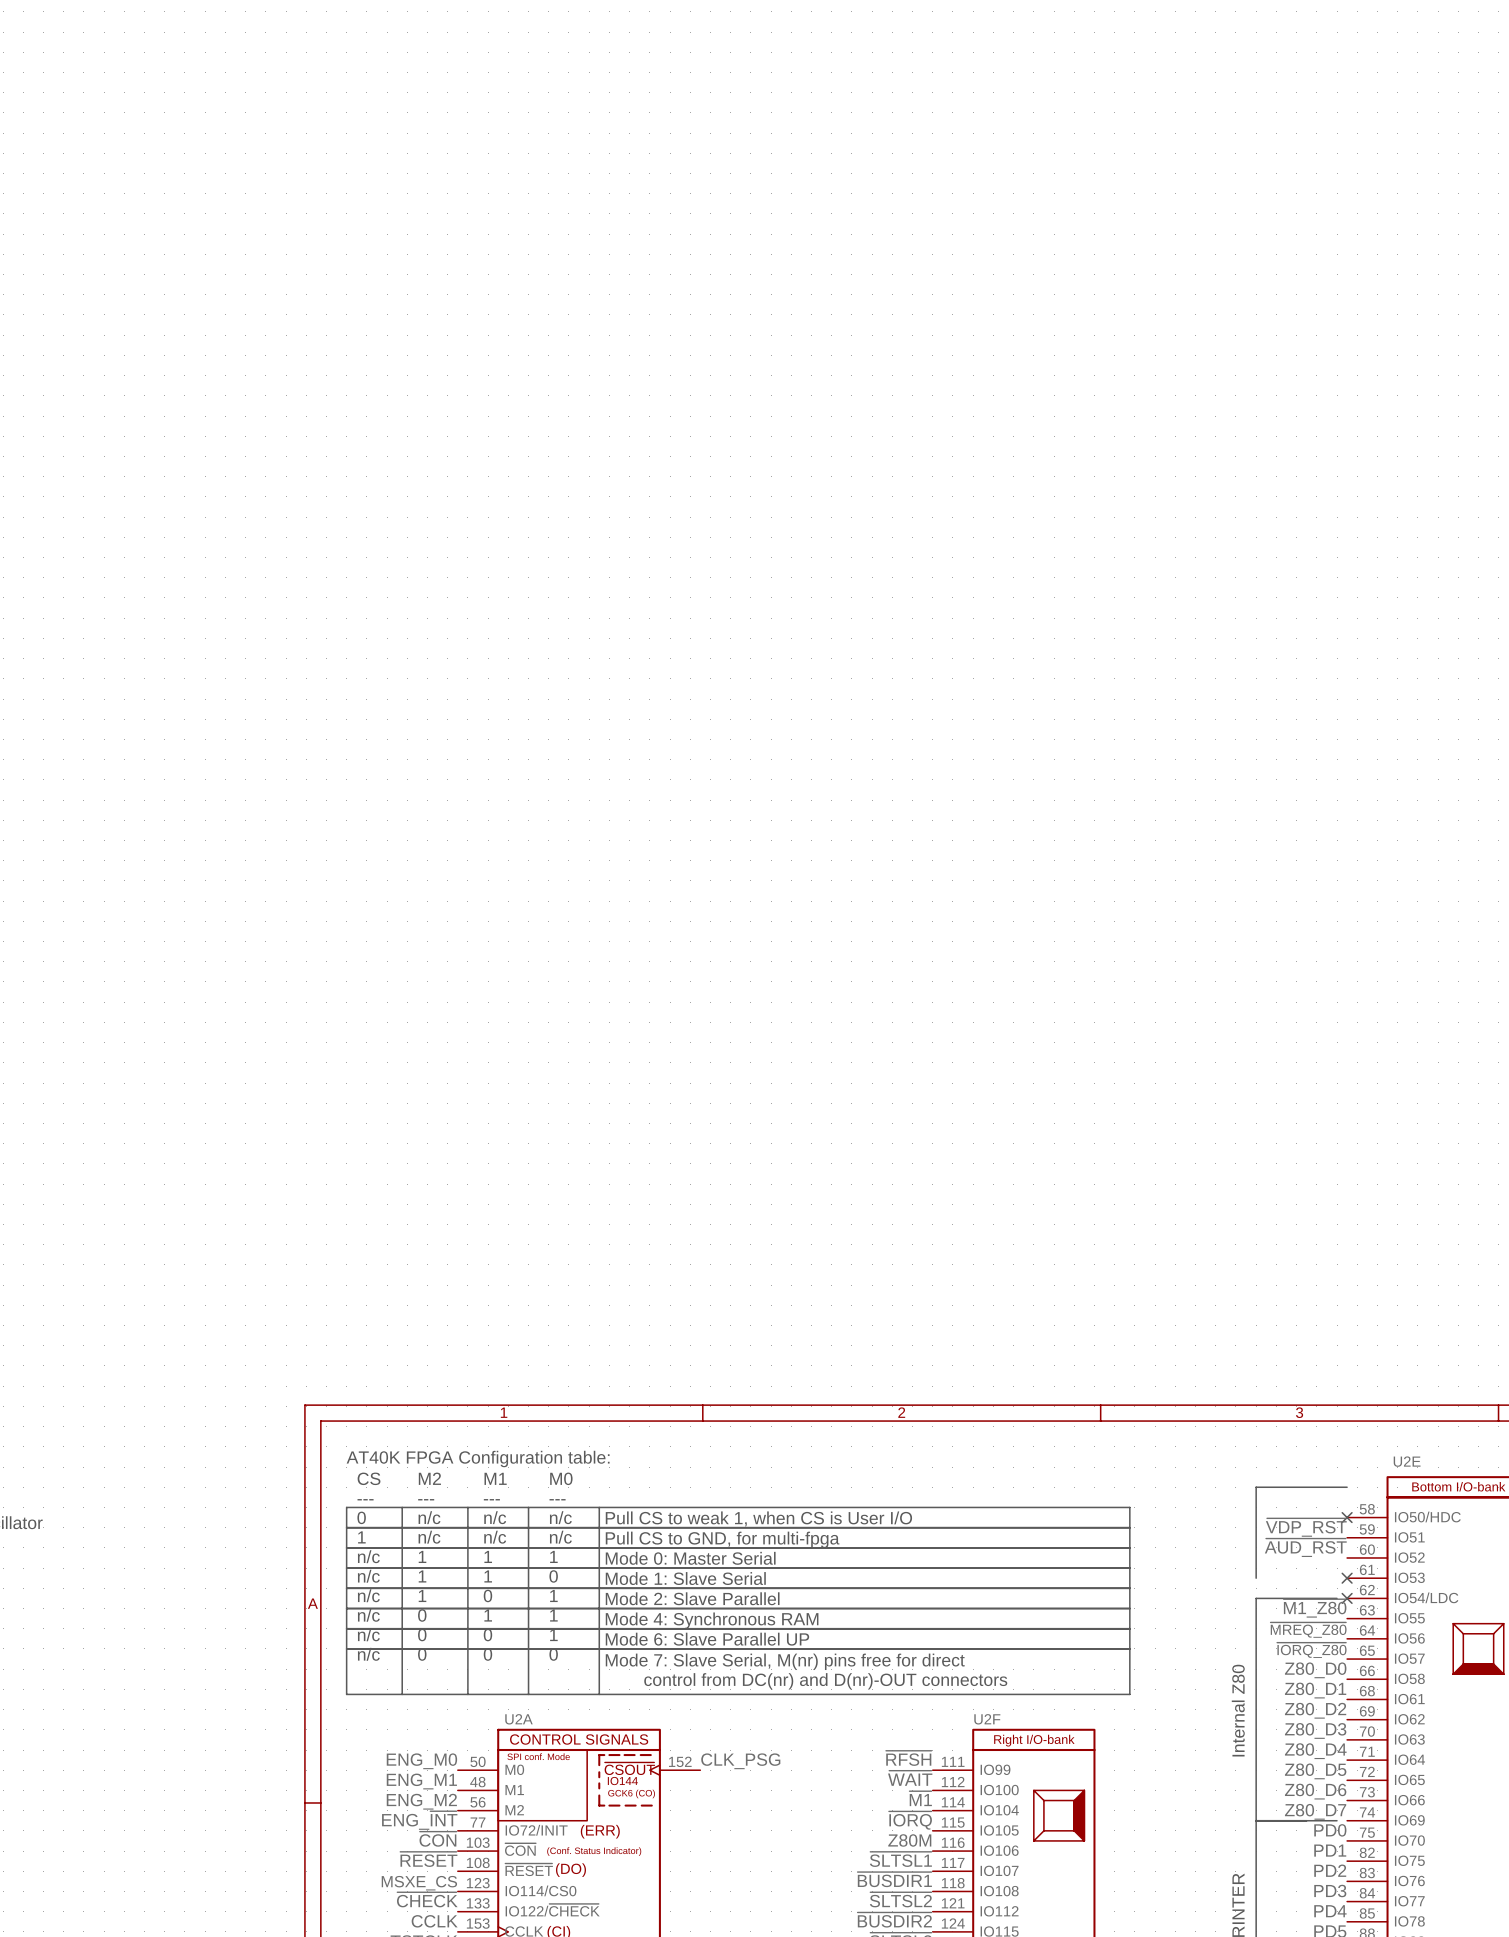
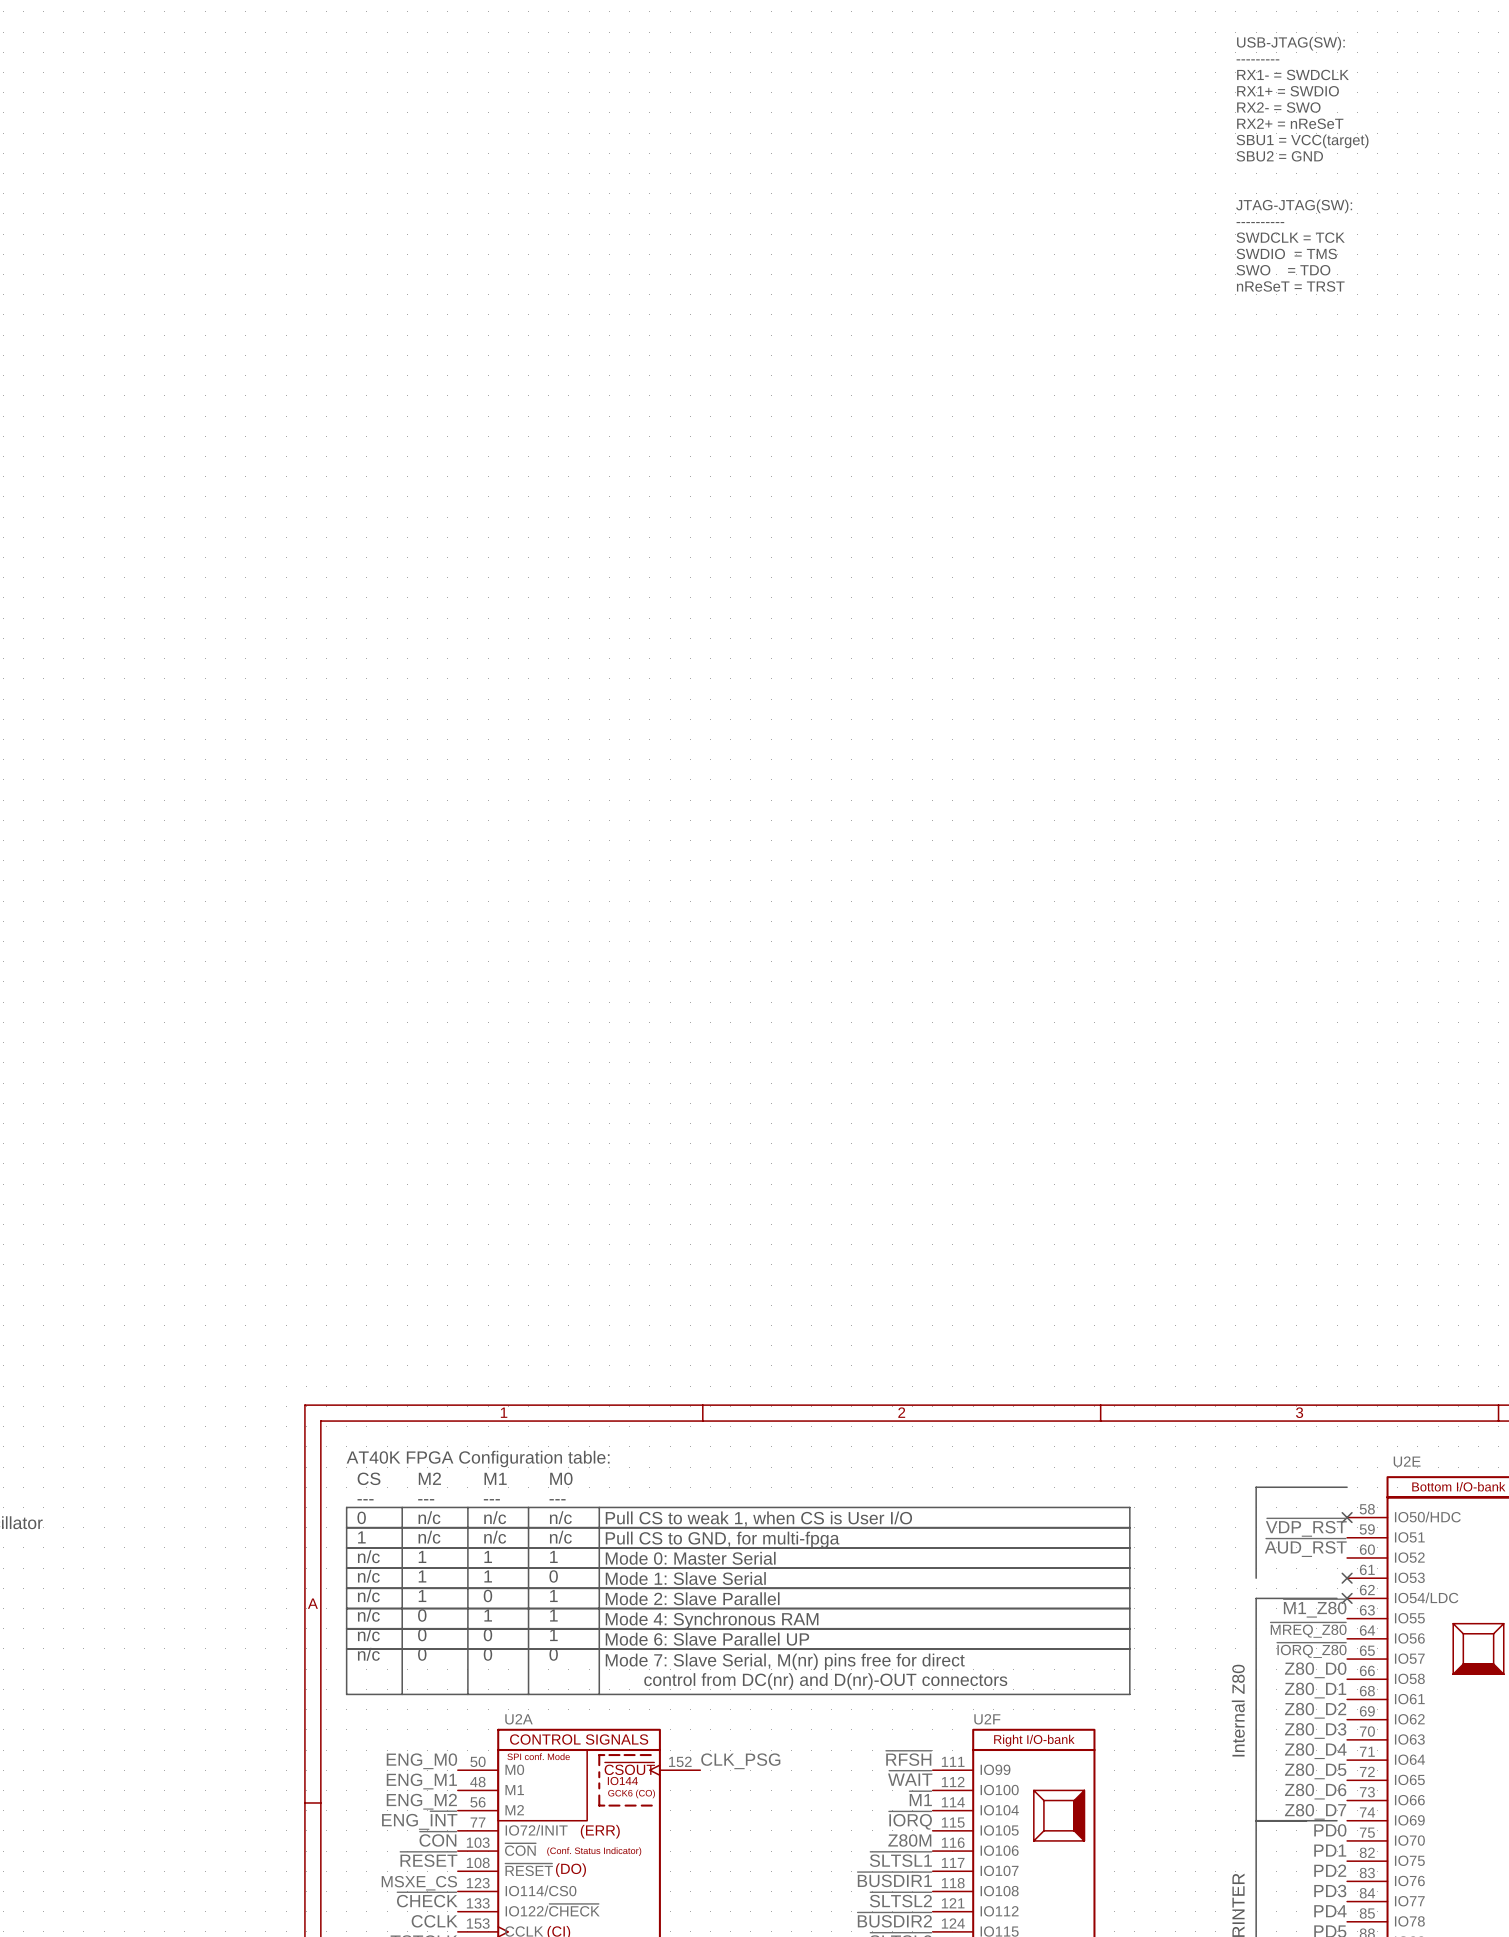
text: none -> USB-JTAG(SW): (1290, 43)
text: none -> --------- (1257, 59)
text: none -> RX1- = SWDCLK (1292, 74)
text: none -> RX1+ = SWDIO (1288, 91)
text: none -> RX2- = SWO (1278, 107)
text: none -> RX2+ = nReSeT (1290, 123)
text: none -> SBU1 = VCC(target) (1302, 141)
text: none -> SBU2 = GND (1279, 156)
text: none -> JTAG-JTAG(SW): (1294, 206)
text: none -> ---------- (1260, 222)
text: none -> SWDCLK = TCK (1290, 237)
text: none -> SWDIO = TMS (1286, 253)
text: none -> SWO = TDO (1283, 270)
text: none -> nReSeT = TRST (1290, 286)

